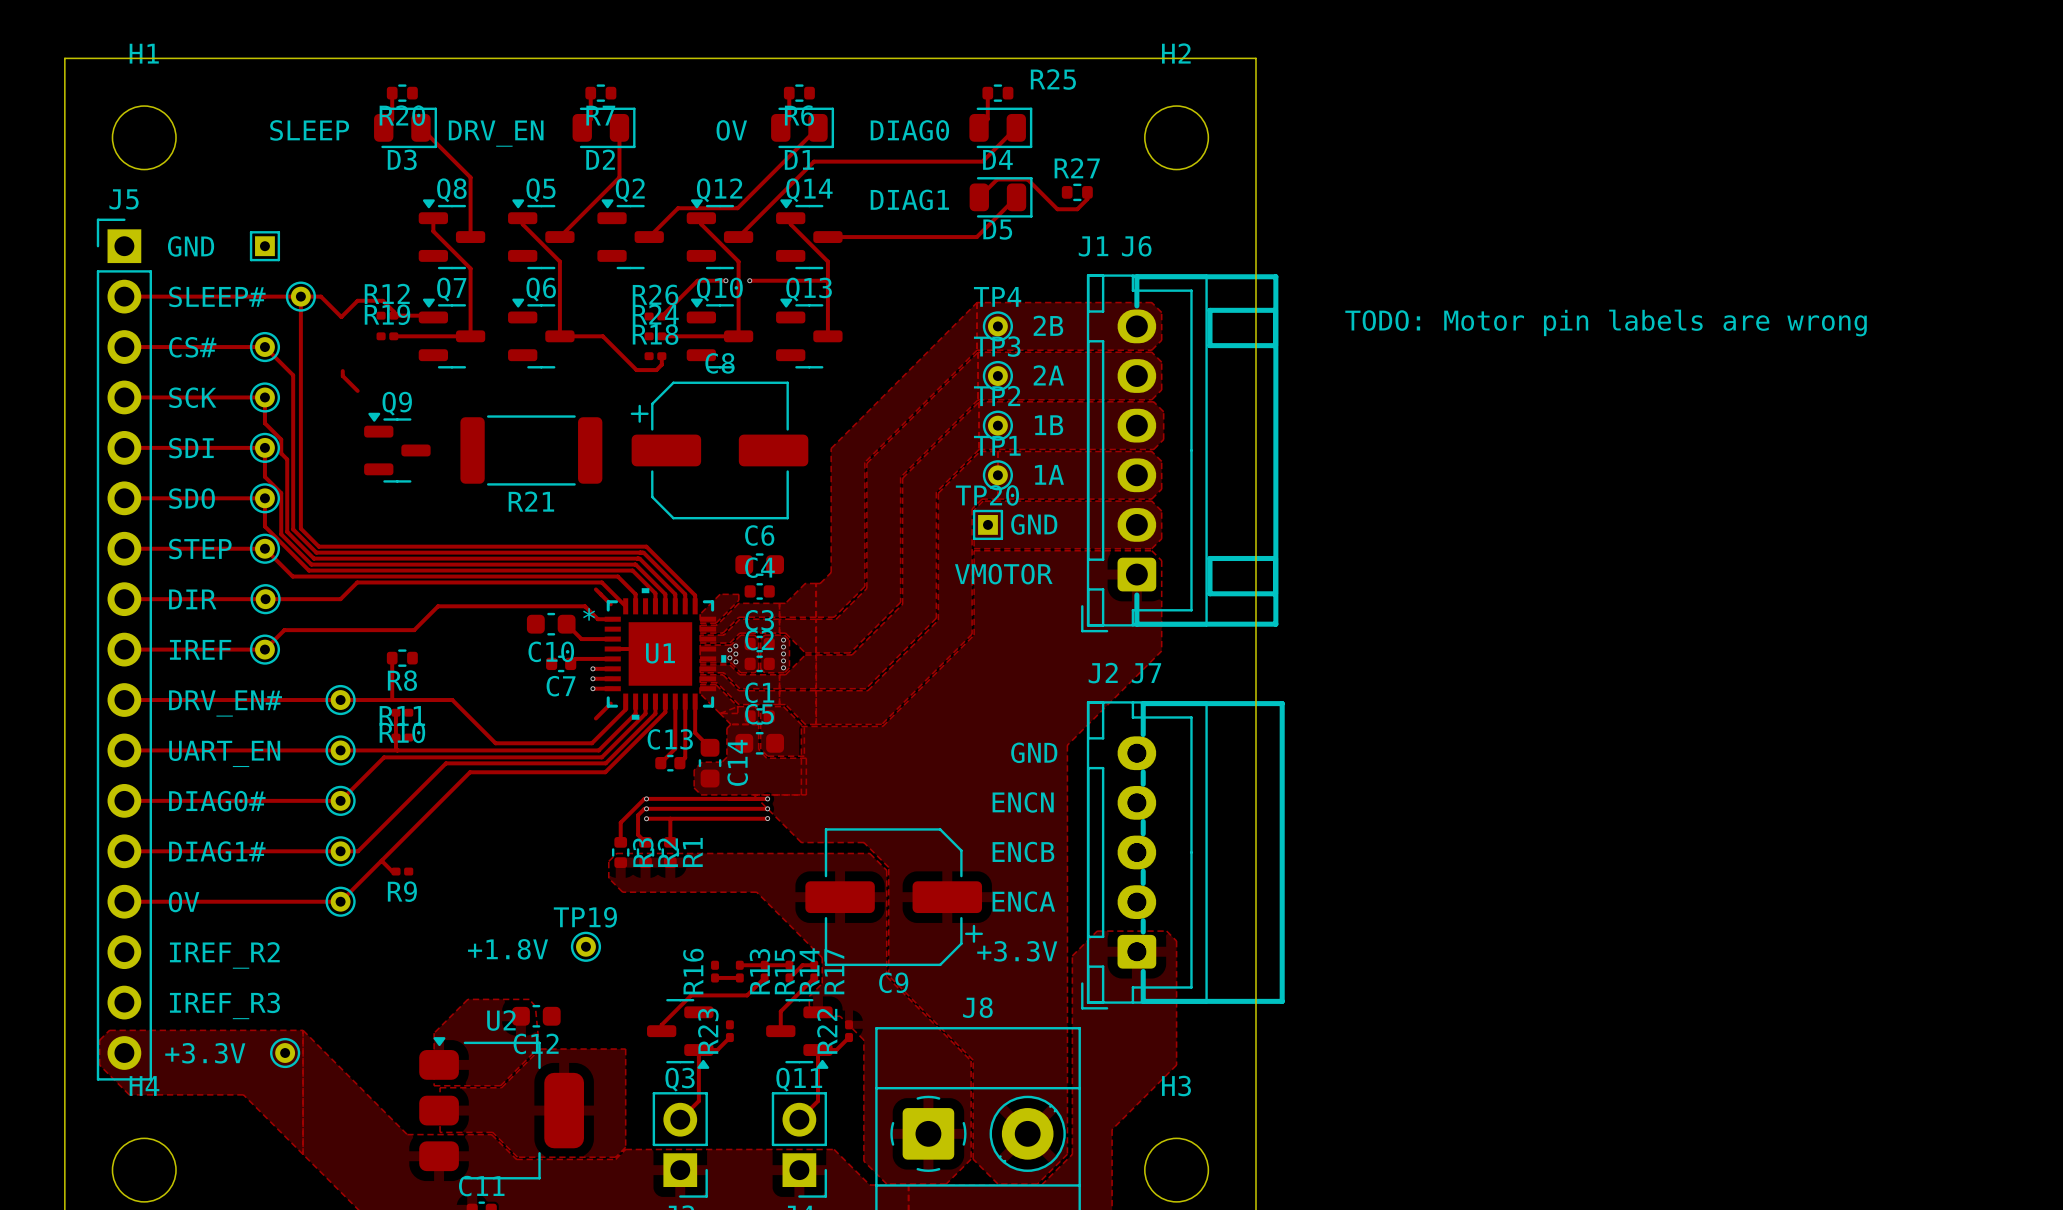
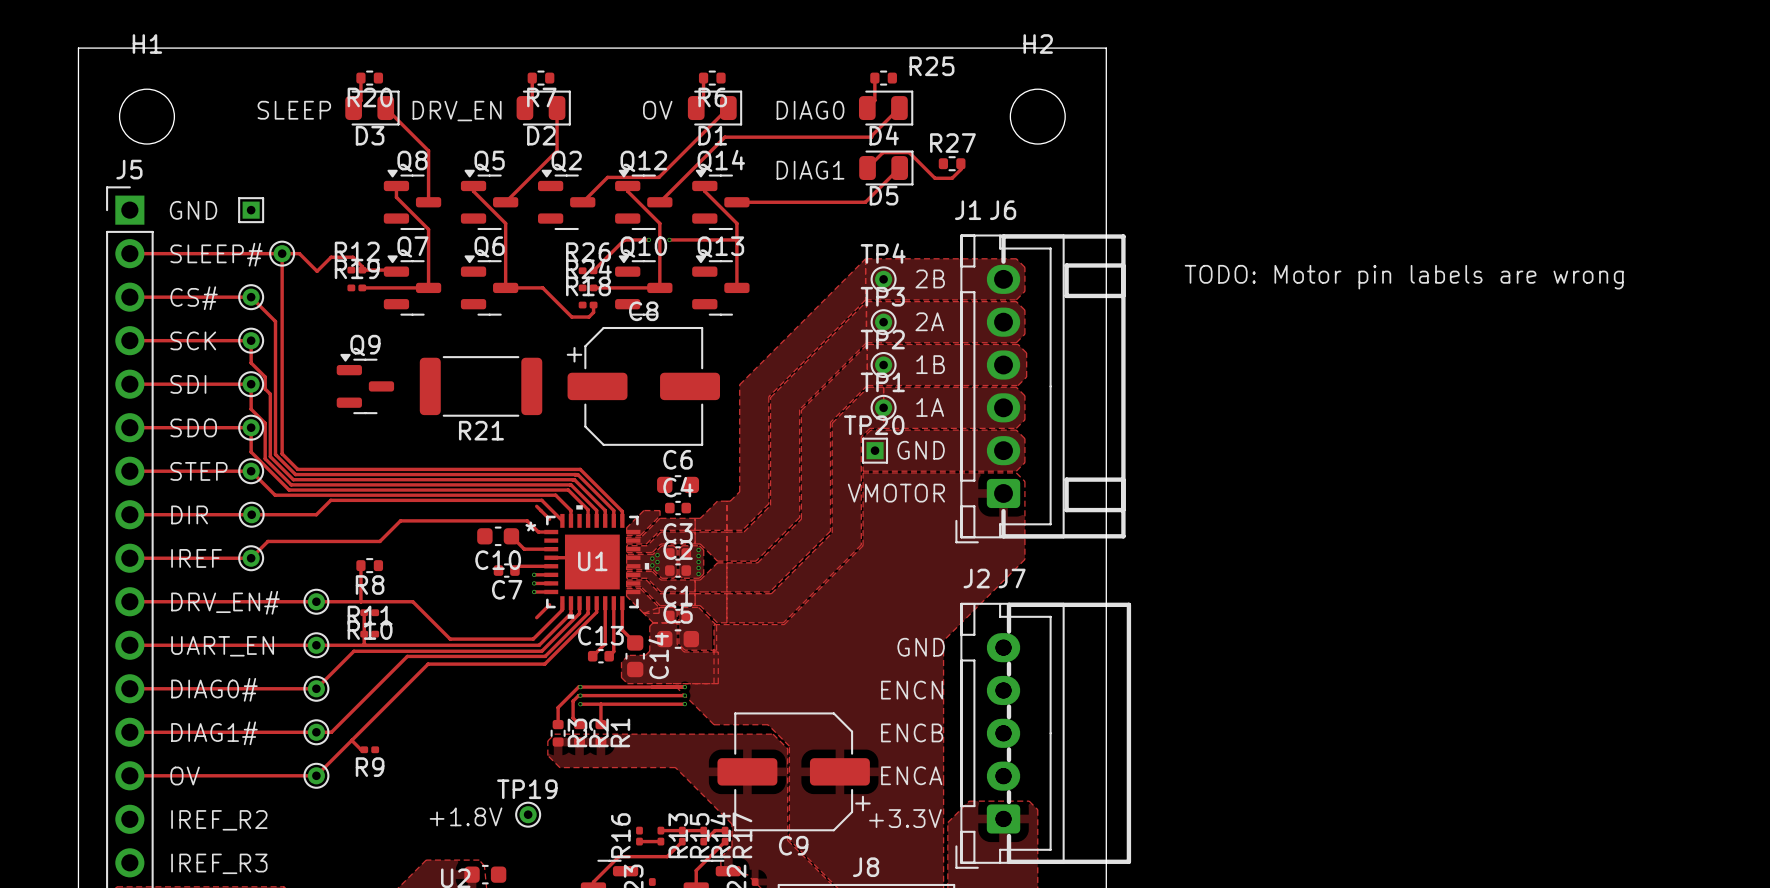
track: (342, 371) (342, 376) (357, 390) -> none

